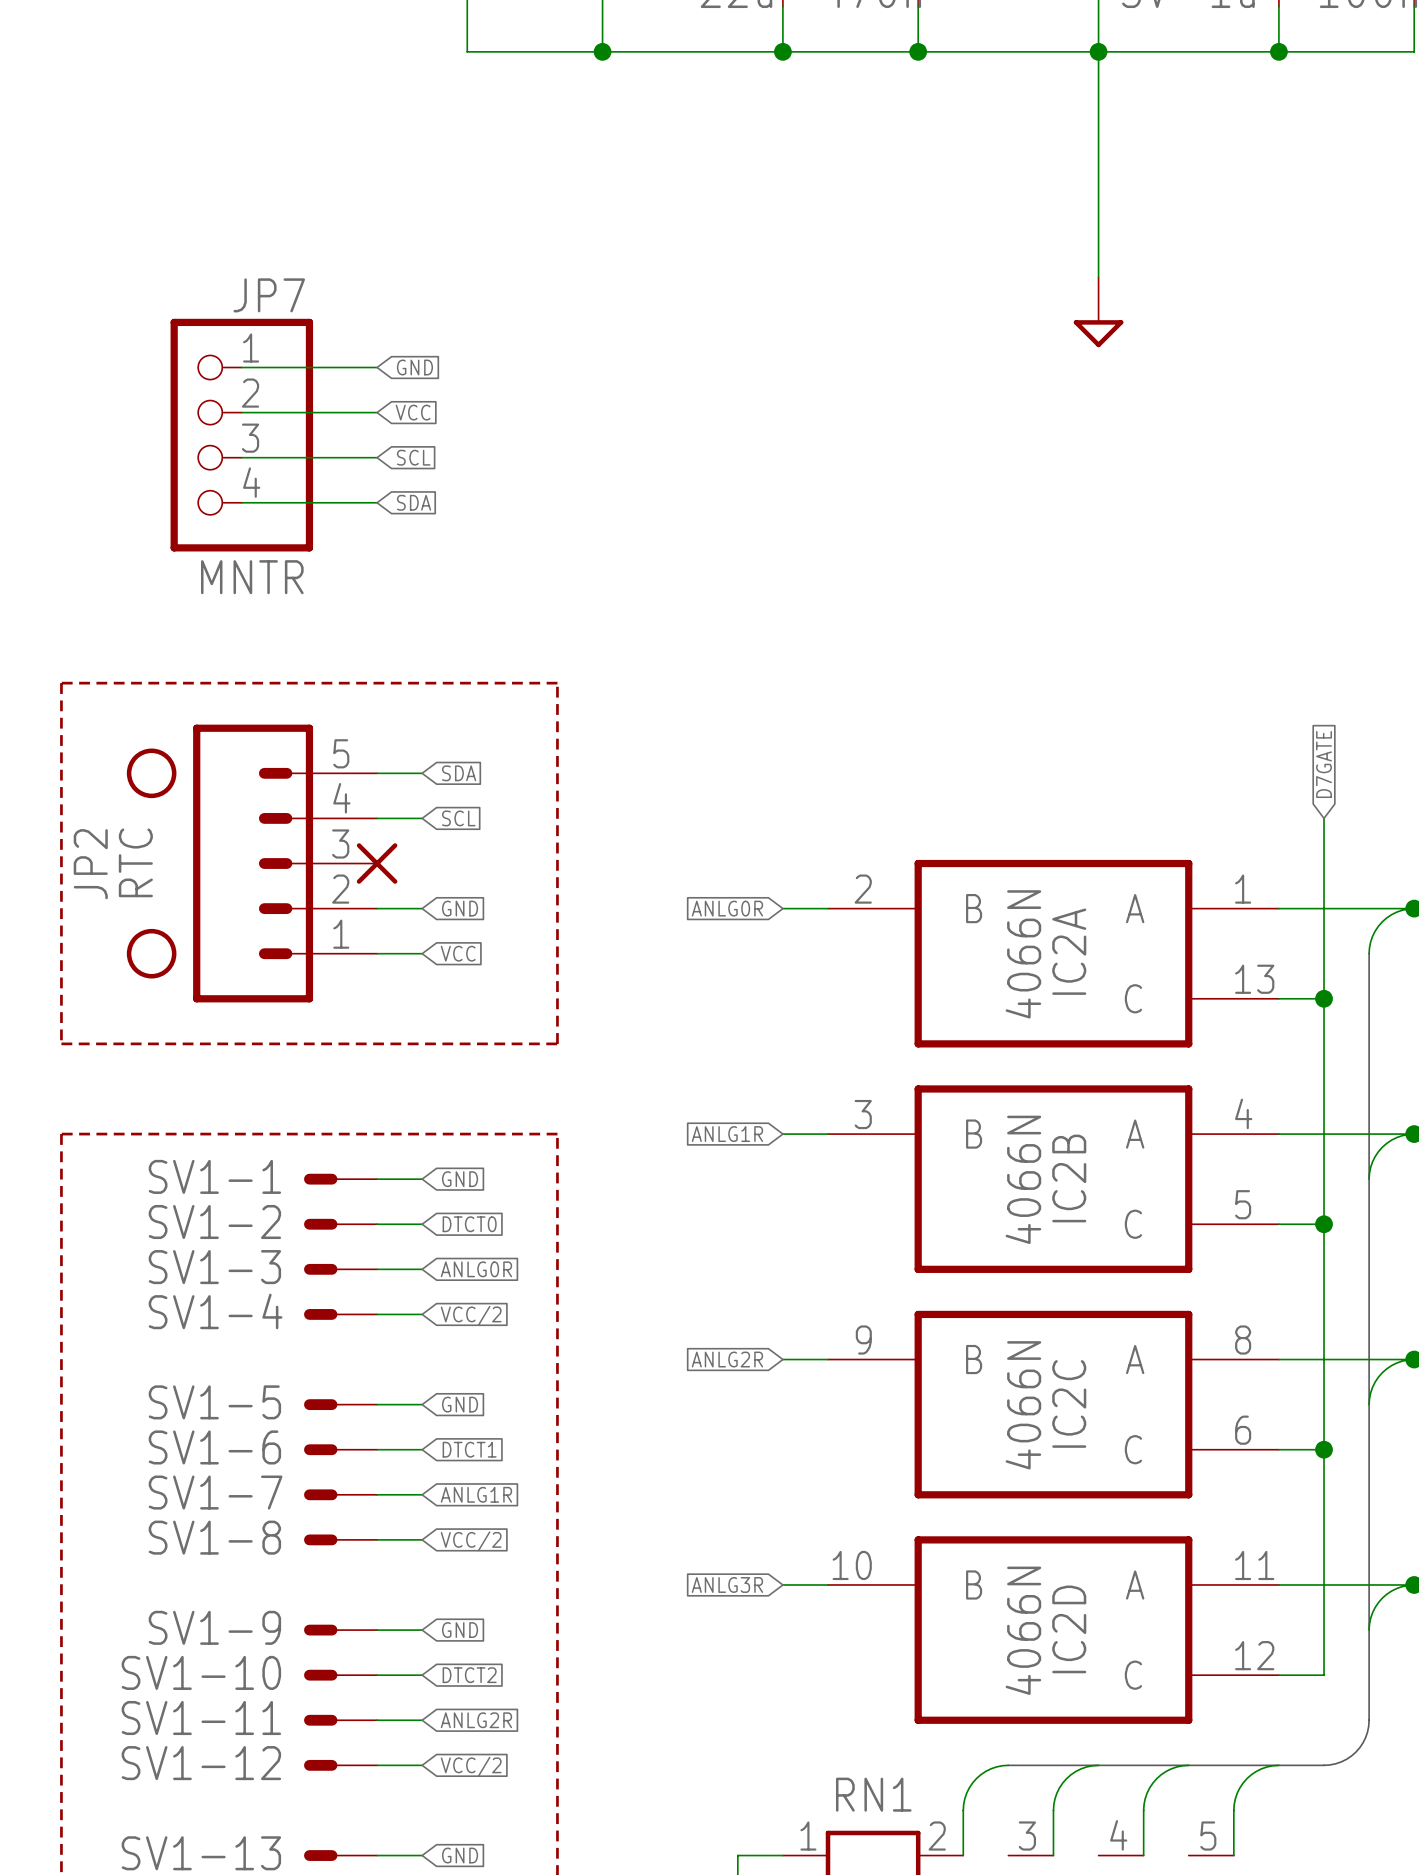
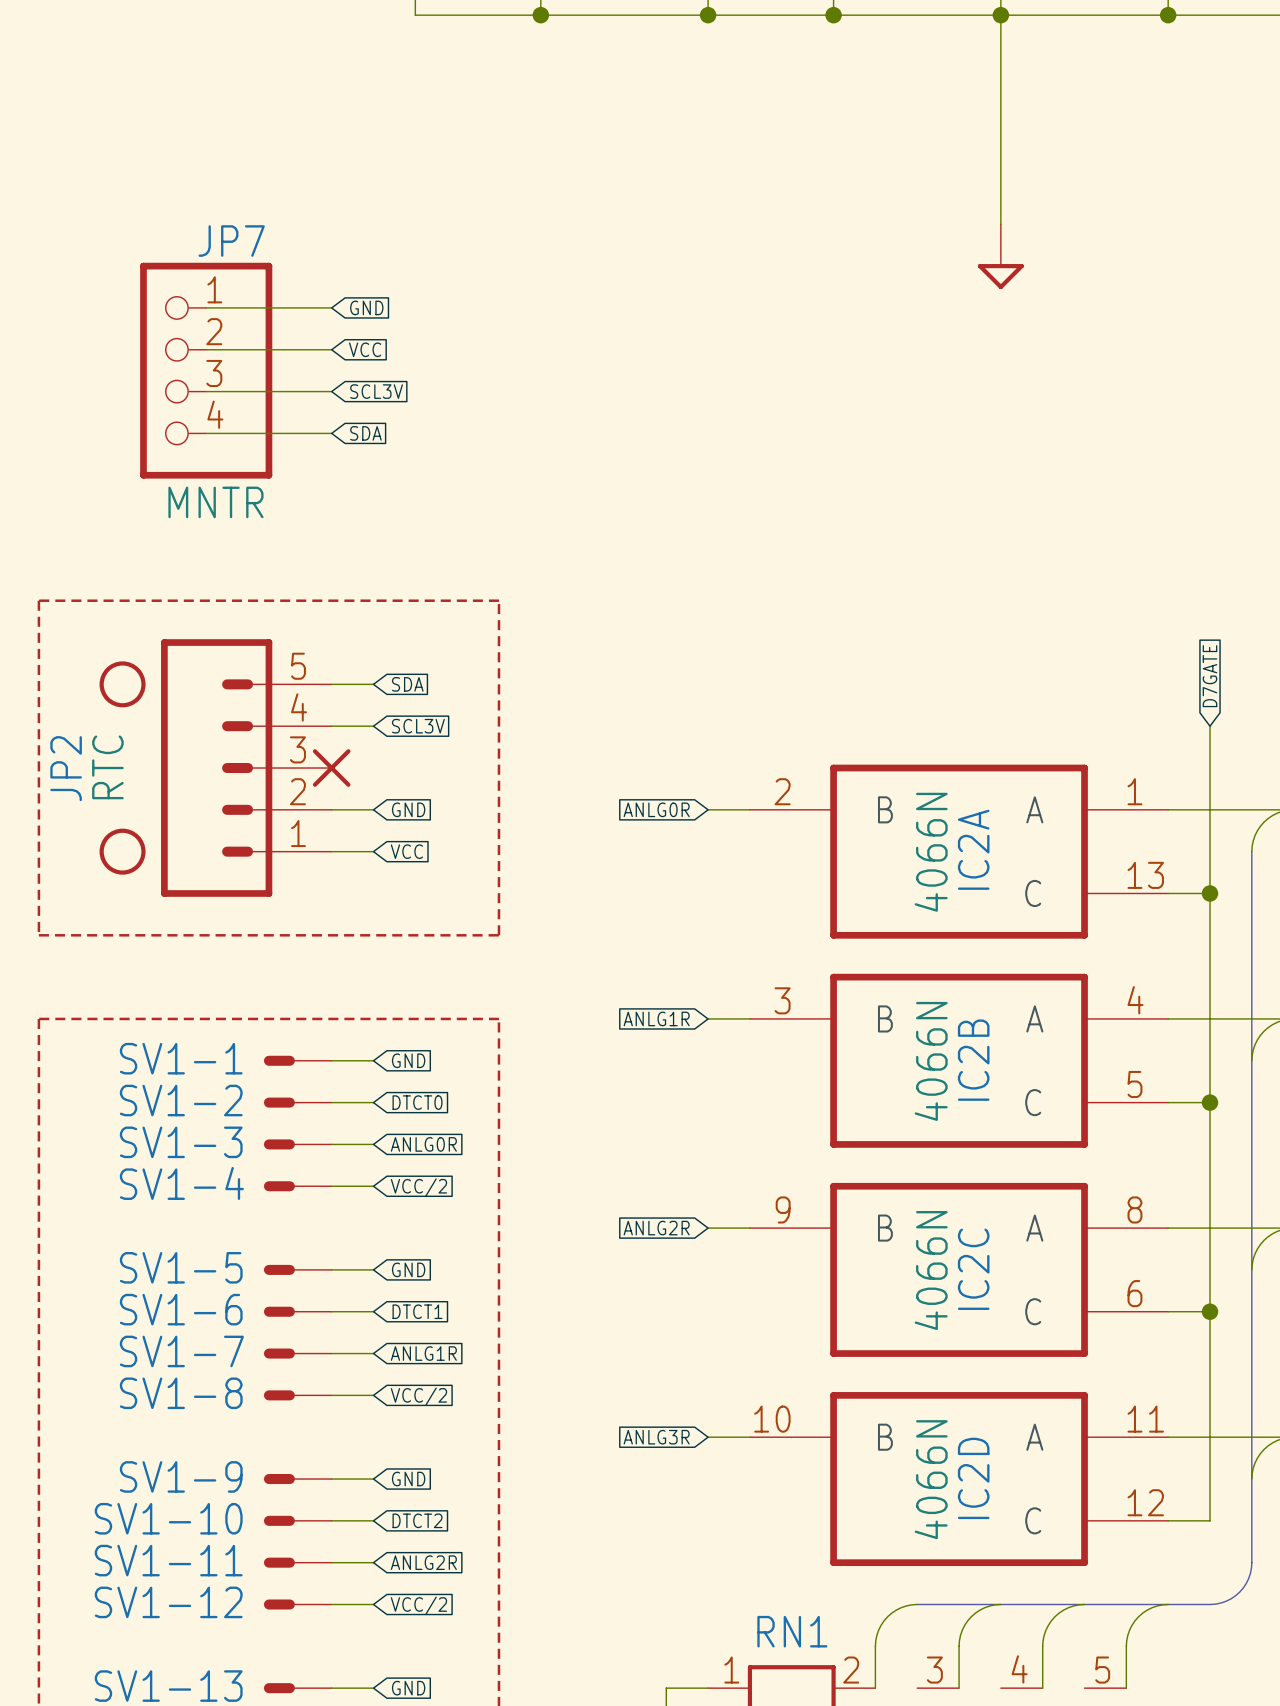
global label: SCL (413, 457) -> SCL3V (376, 391)
global label: SCL (458, 818) -> SCL3V (418, 726)

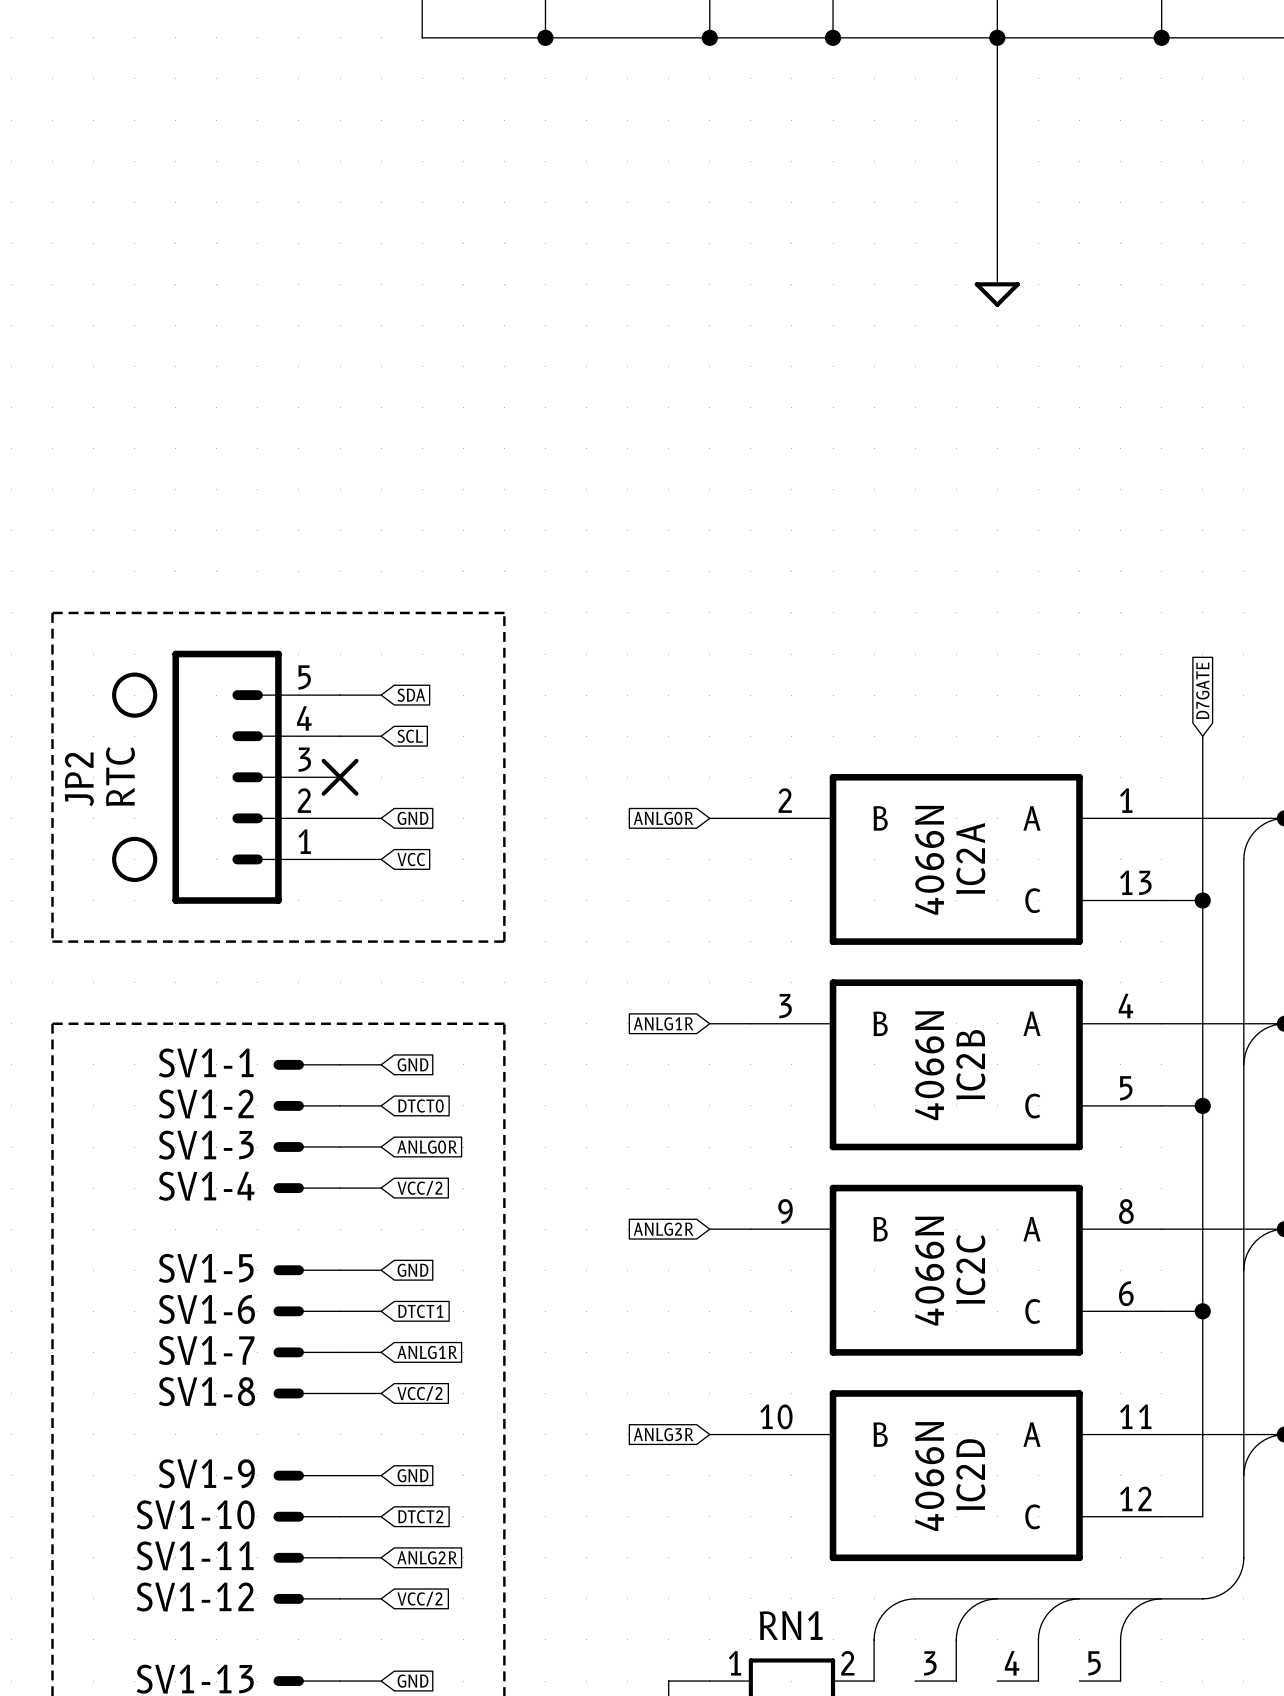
wire: (206, 307) (331, 307) -> none
global label: GND (366, 307) -> none
wire: (206, 349) (331, 349) -> none
global label: VCC (365, 349) -> none
JP7: MNTR (206, 370) -> none
wire: (206, 391) (331, 391) -> none
global label: SCL3V (376, 391) -> none
wire: (206, 433) (331, 433) -> none
global label: SDA (365, 433) -> none
global label: SCL3V (418, 726) -> SCL (410, 736)

